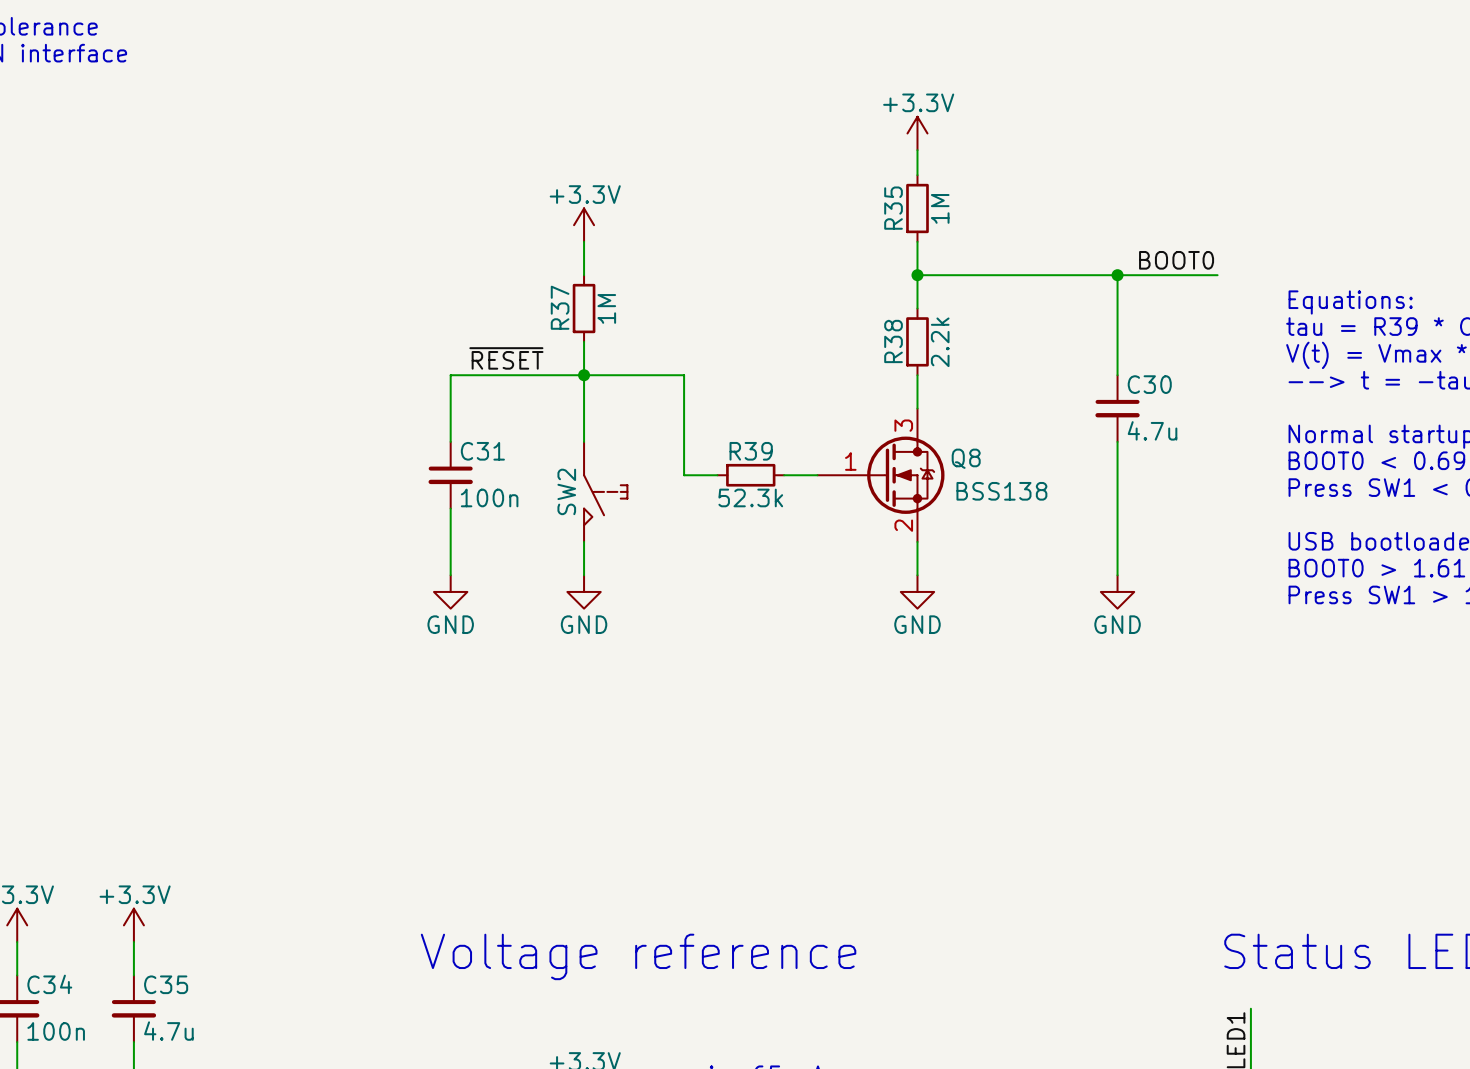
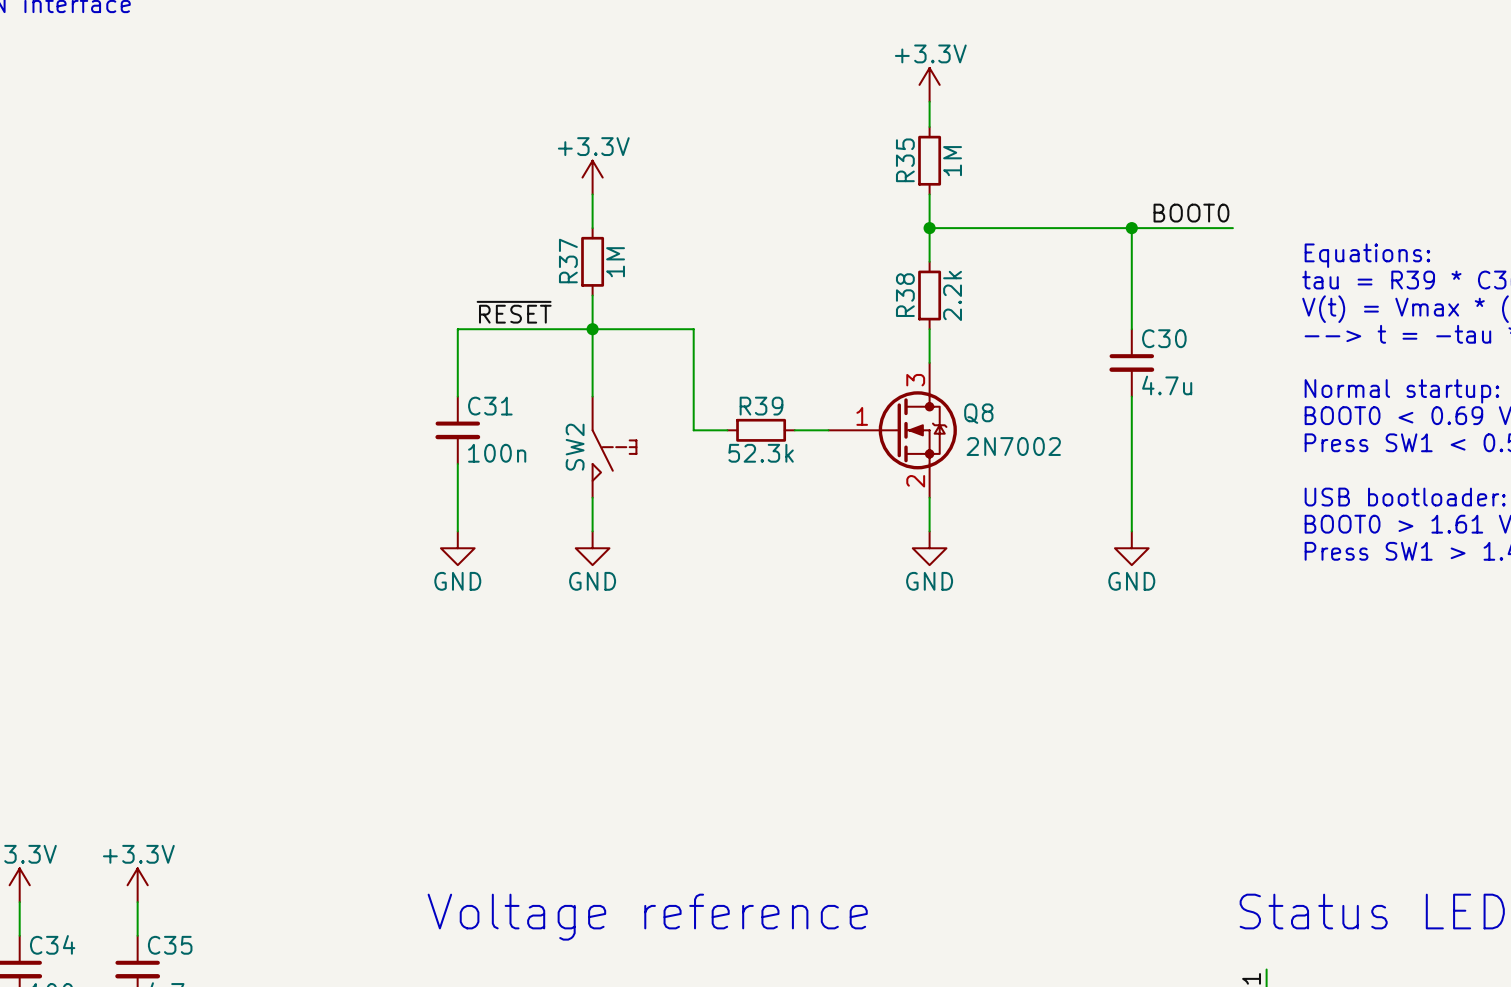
Q8 value: BSS138 (1001, 491) -> 2N7002 (1013, 446)

